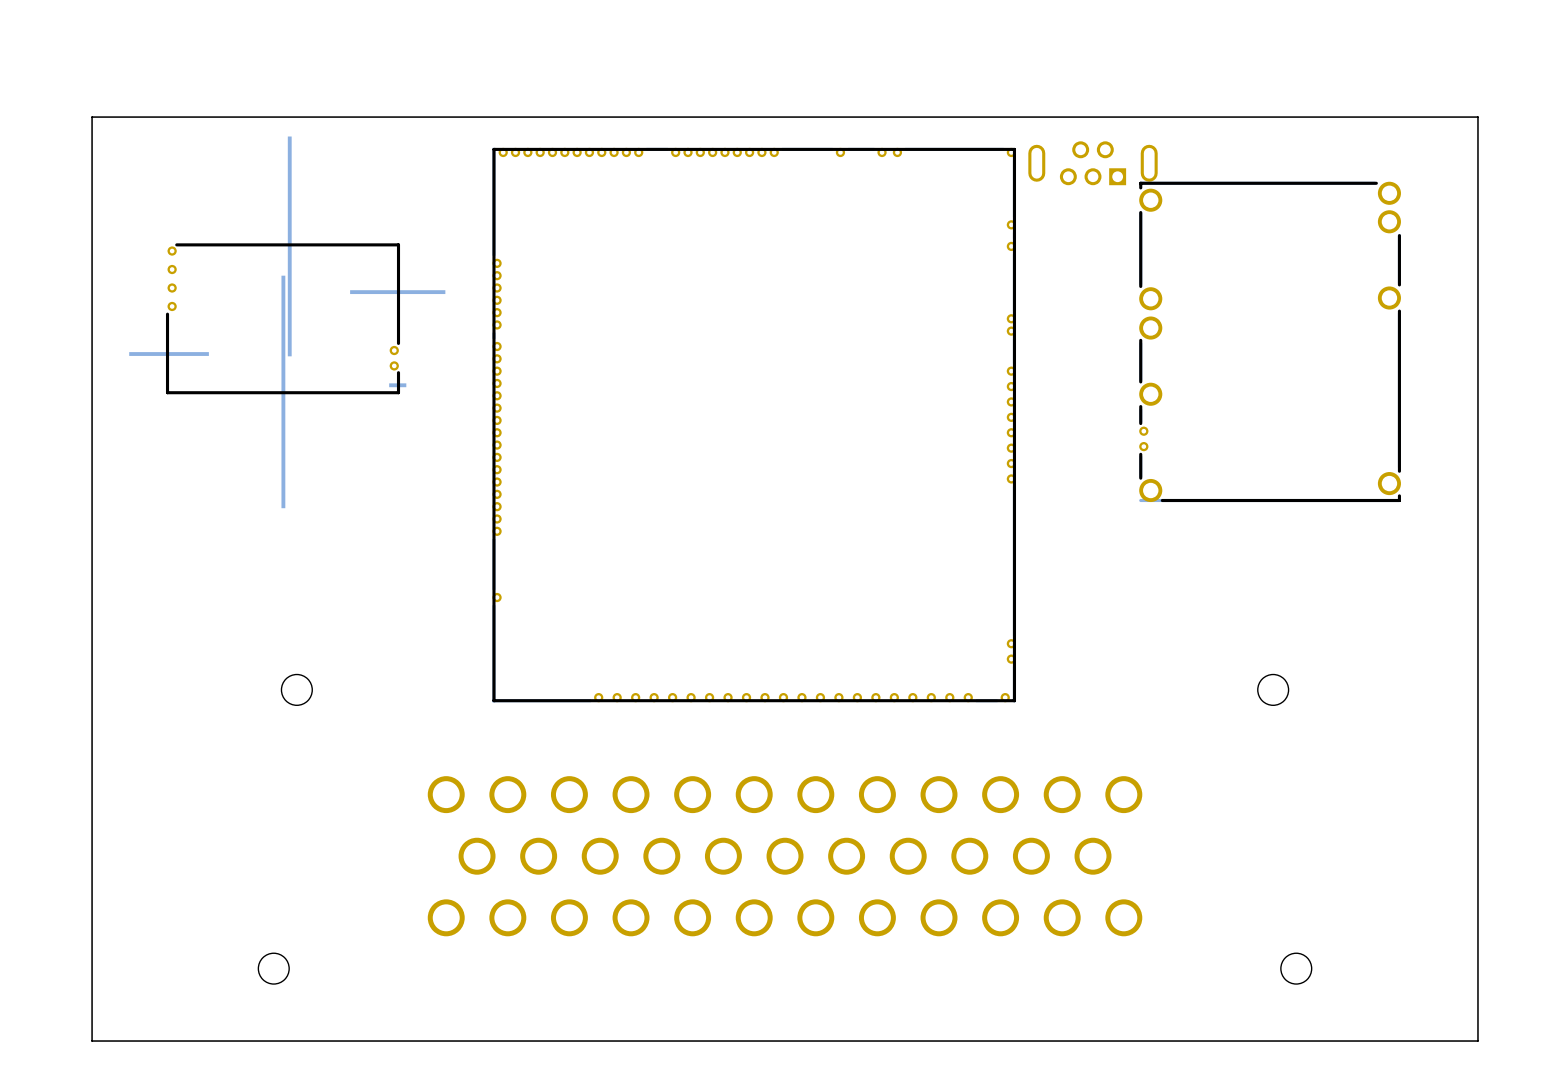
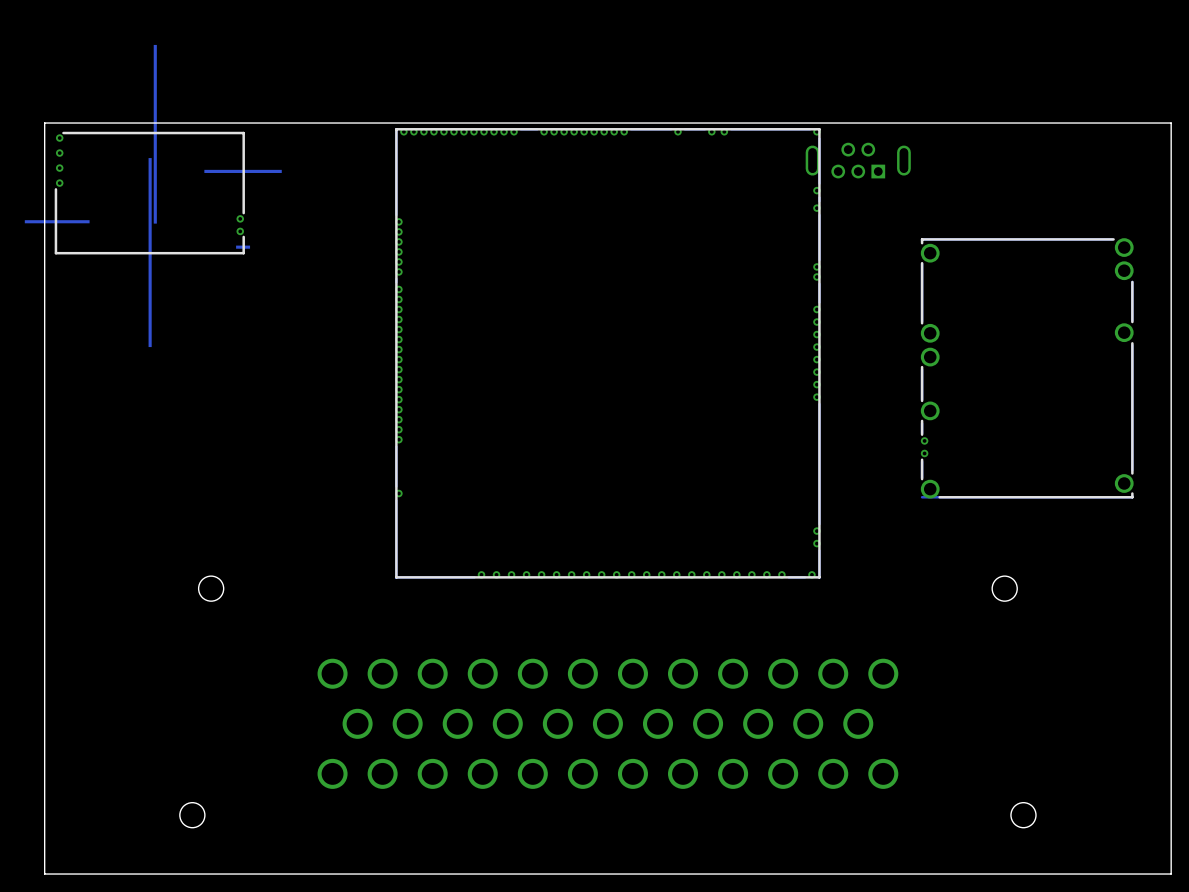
part position: (287, 322) -> (153, 196)
part position: (1270, 341) -> (1027, 368)
part position: (754, 425) -> (607, 353)

